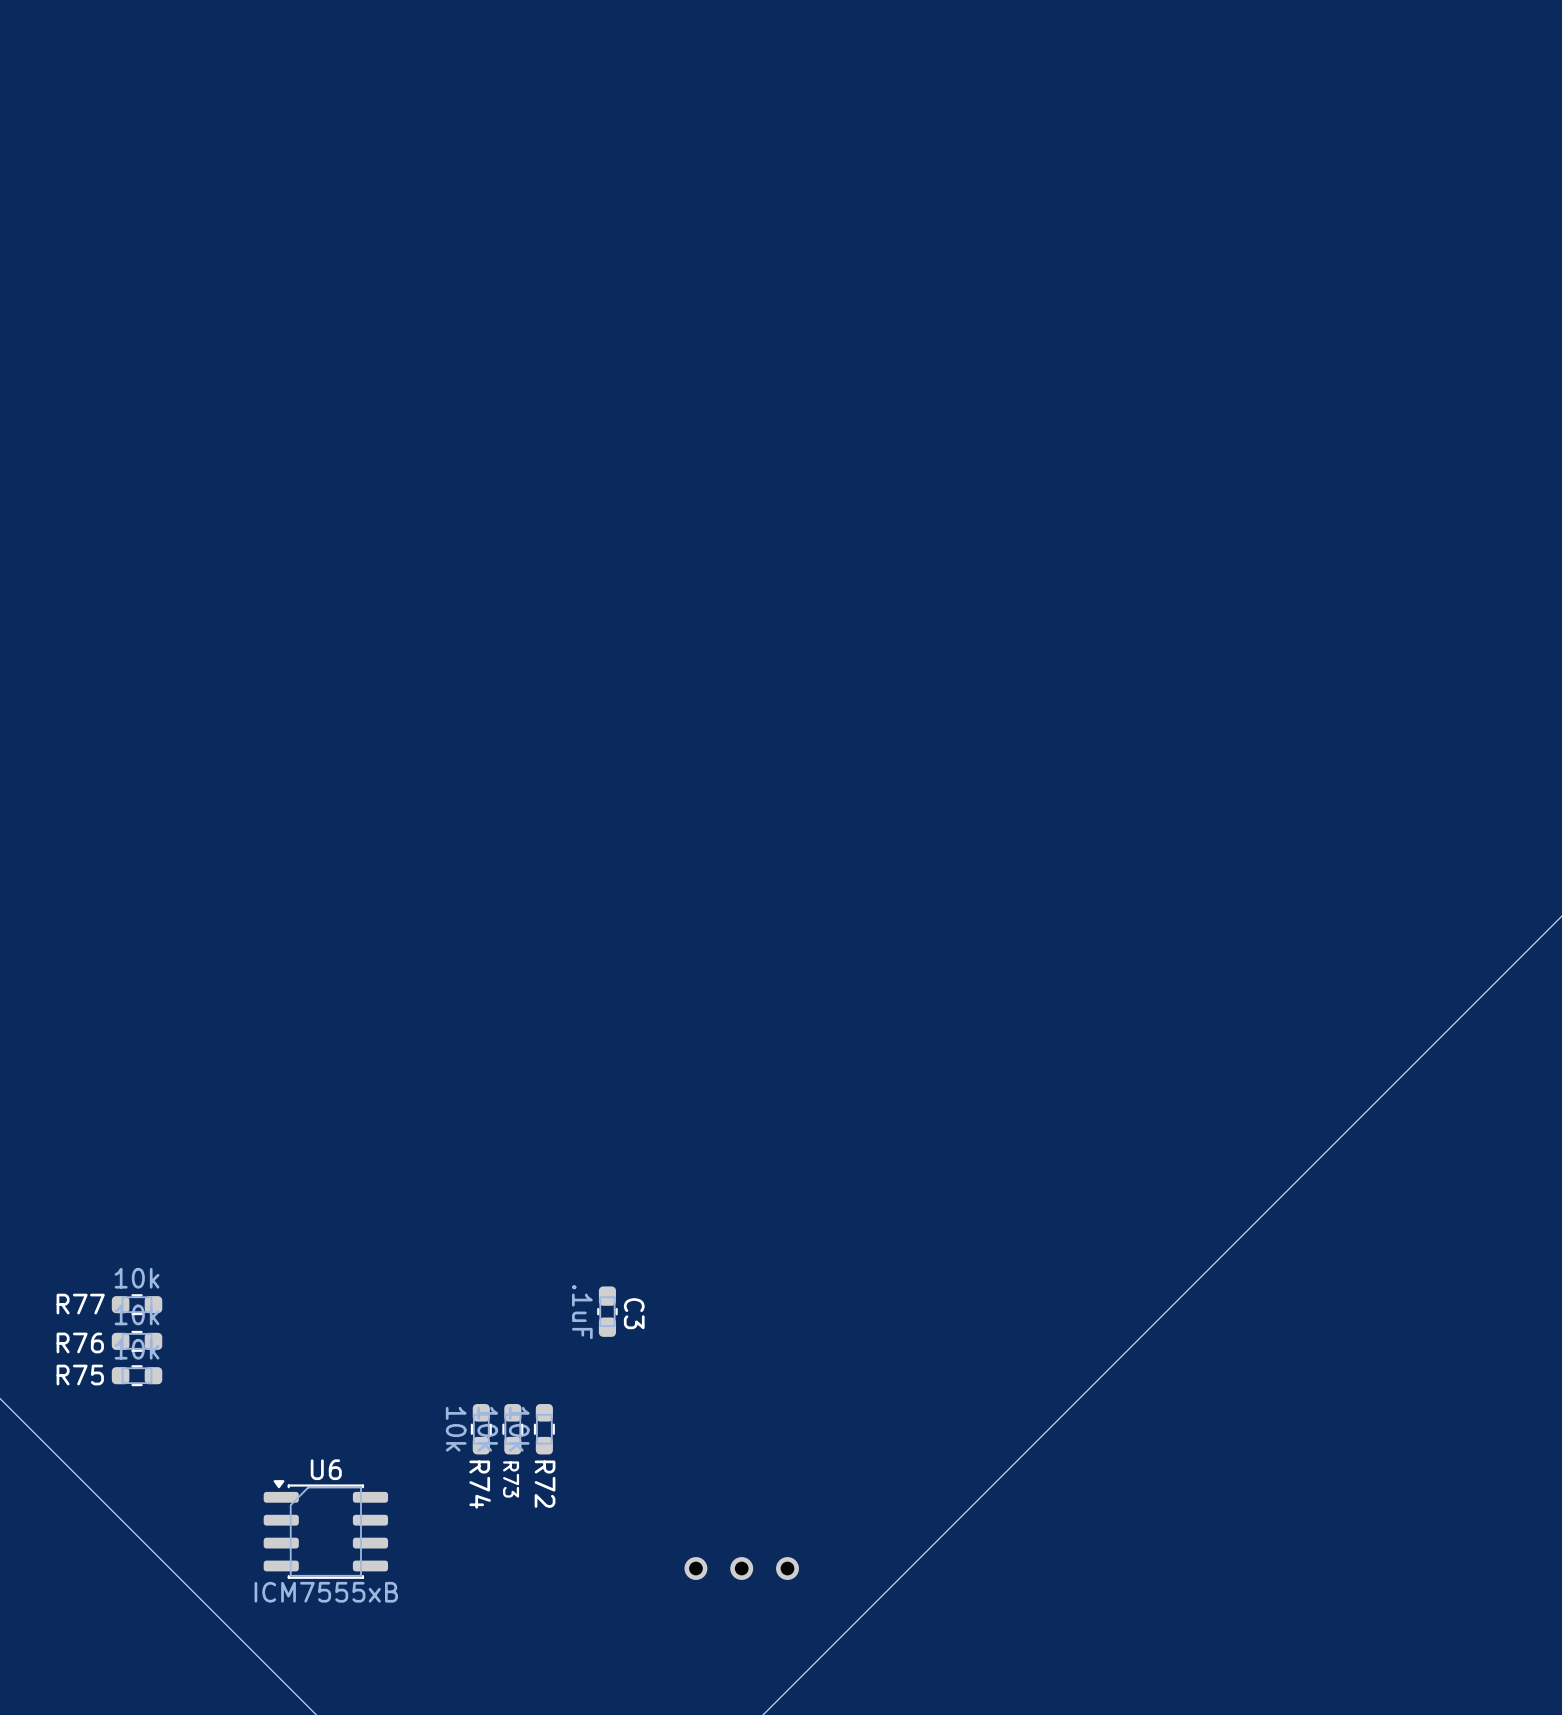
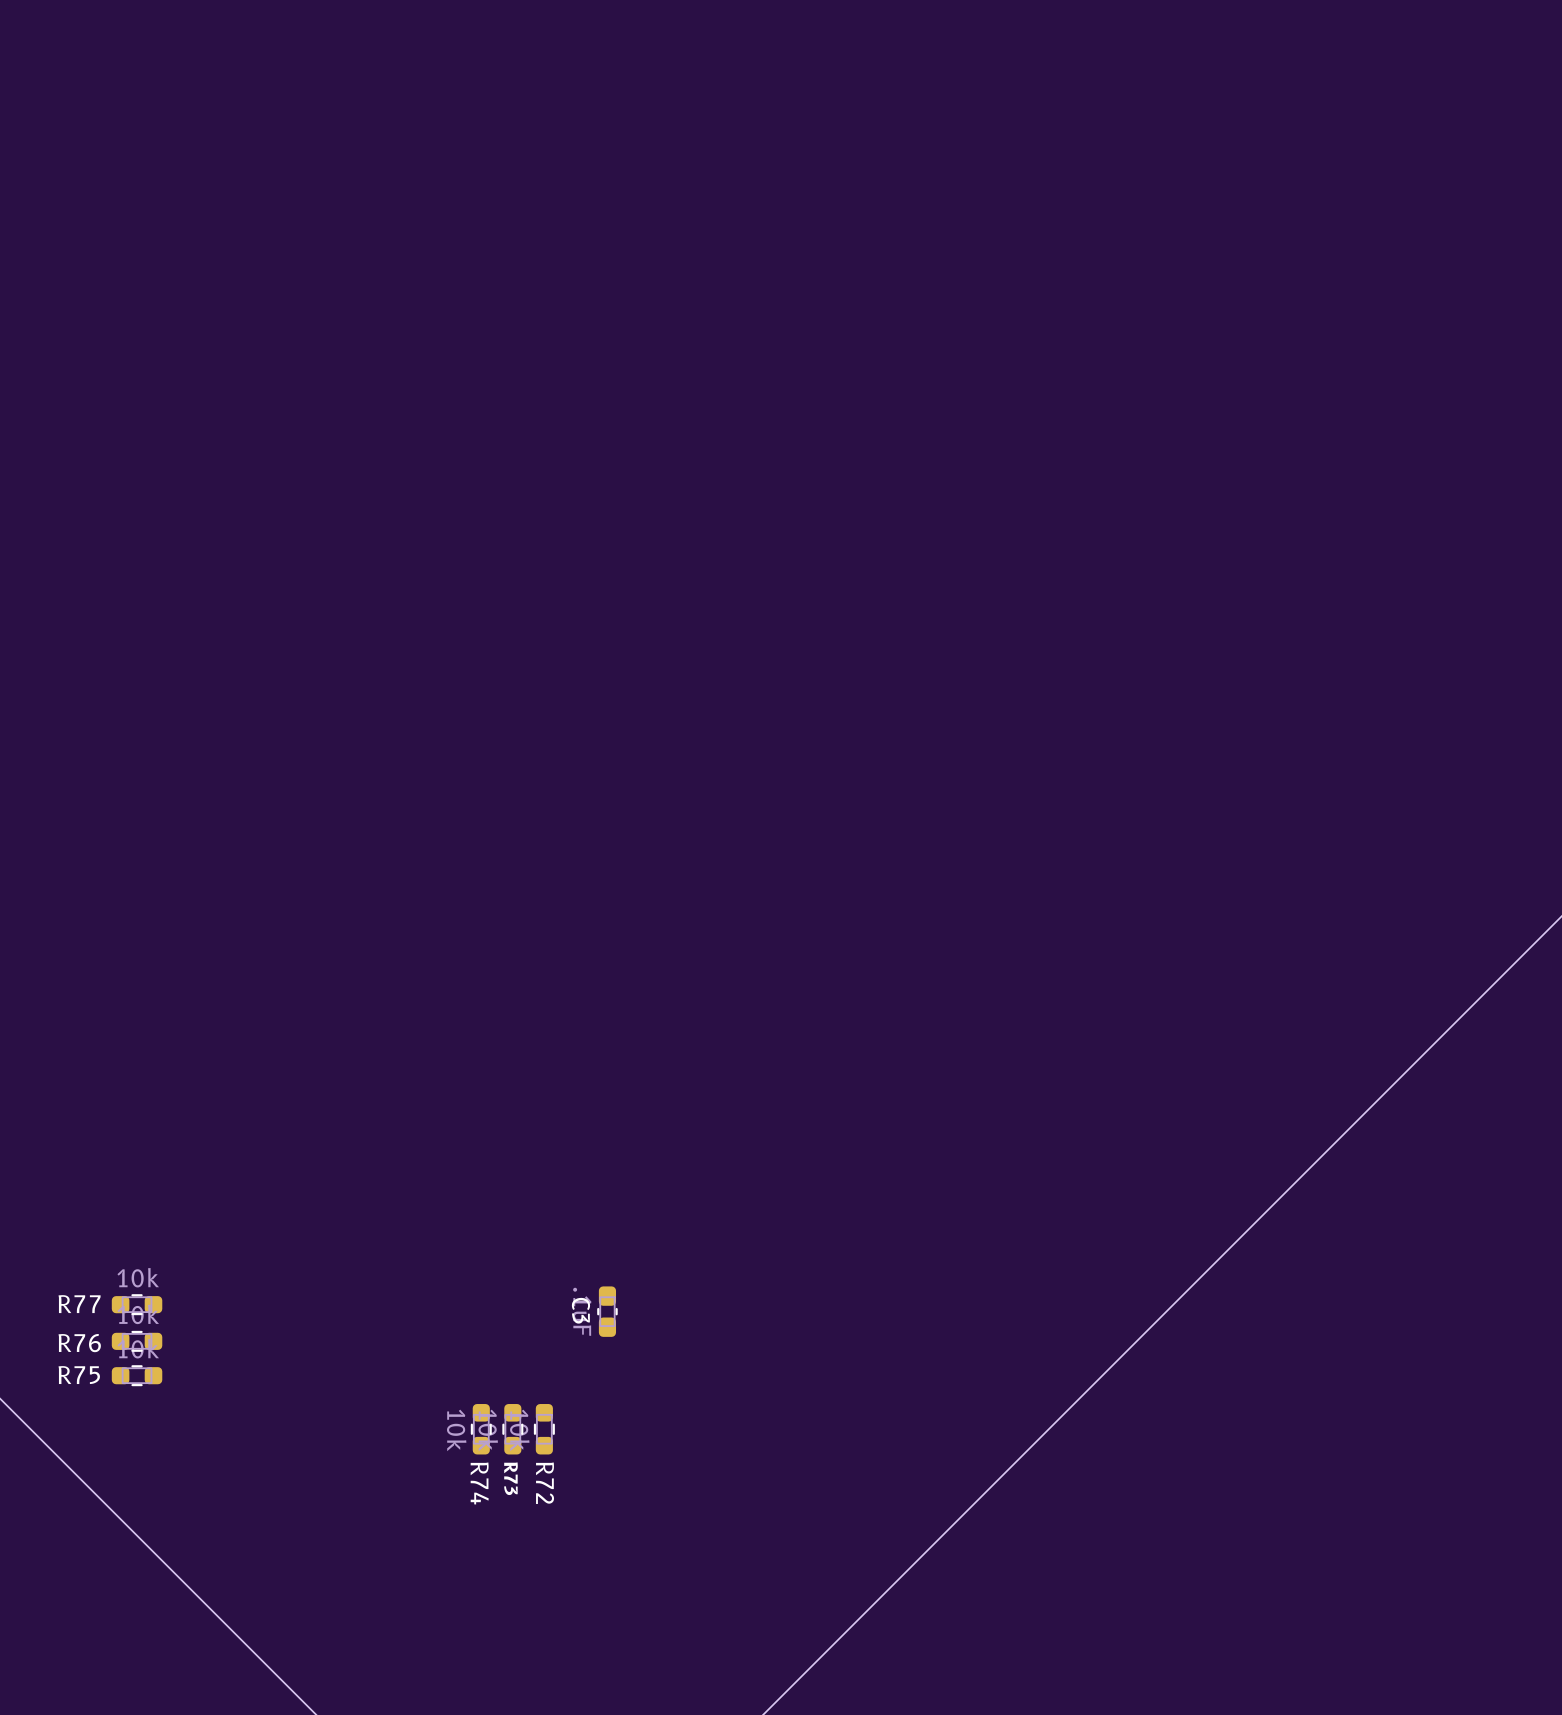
C3 name position: C3 (634, 1313) -> C3 (580, 1310)
U6: ICM7555xB (325, 1529) -> none
part: (741, 1568) -> none

